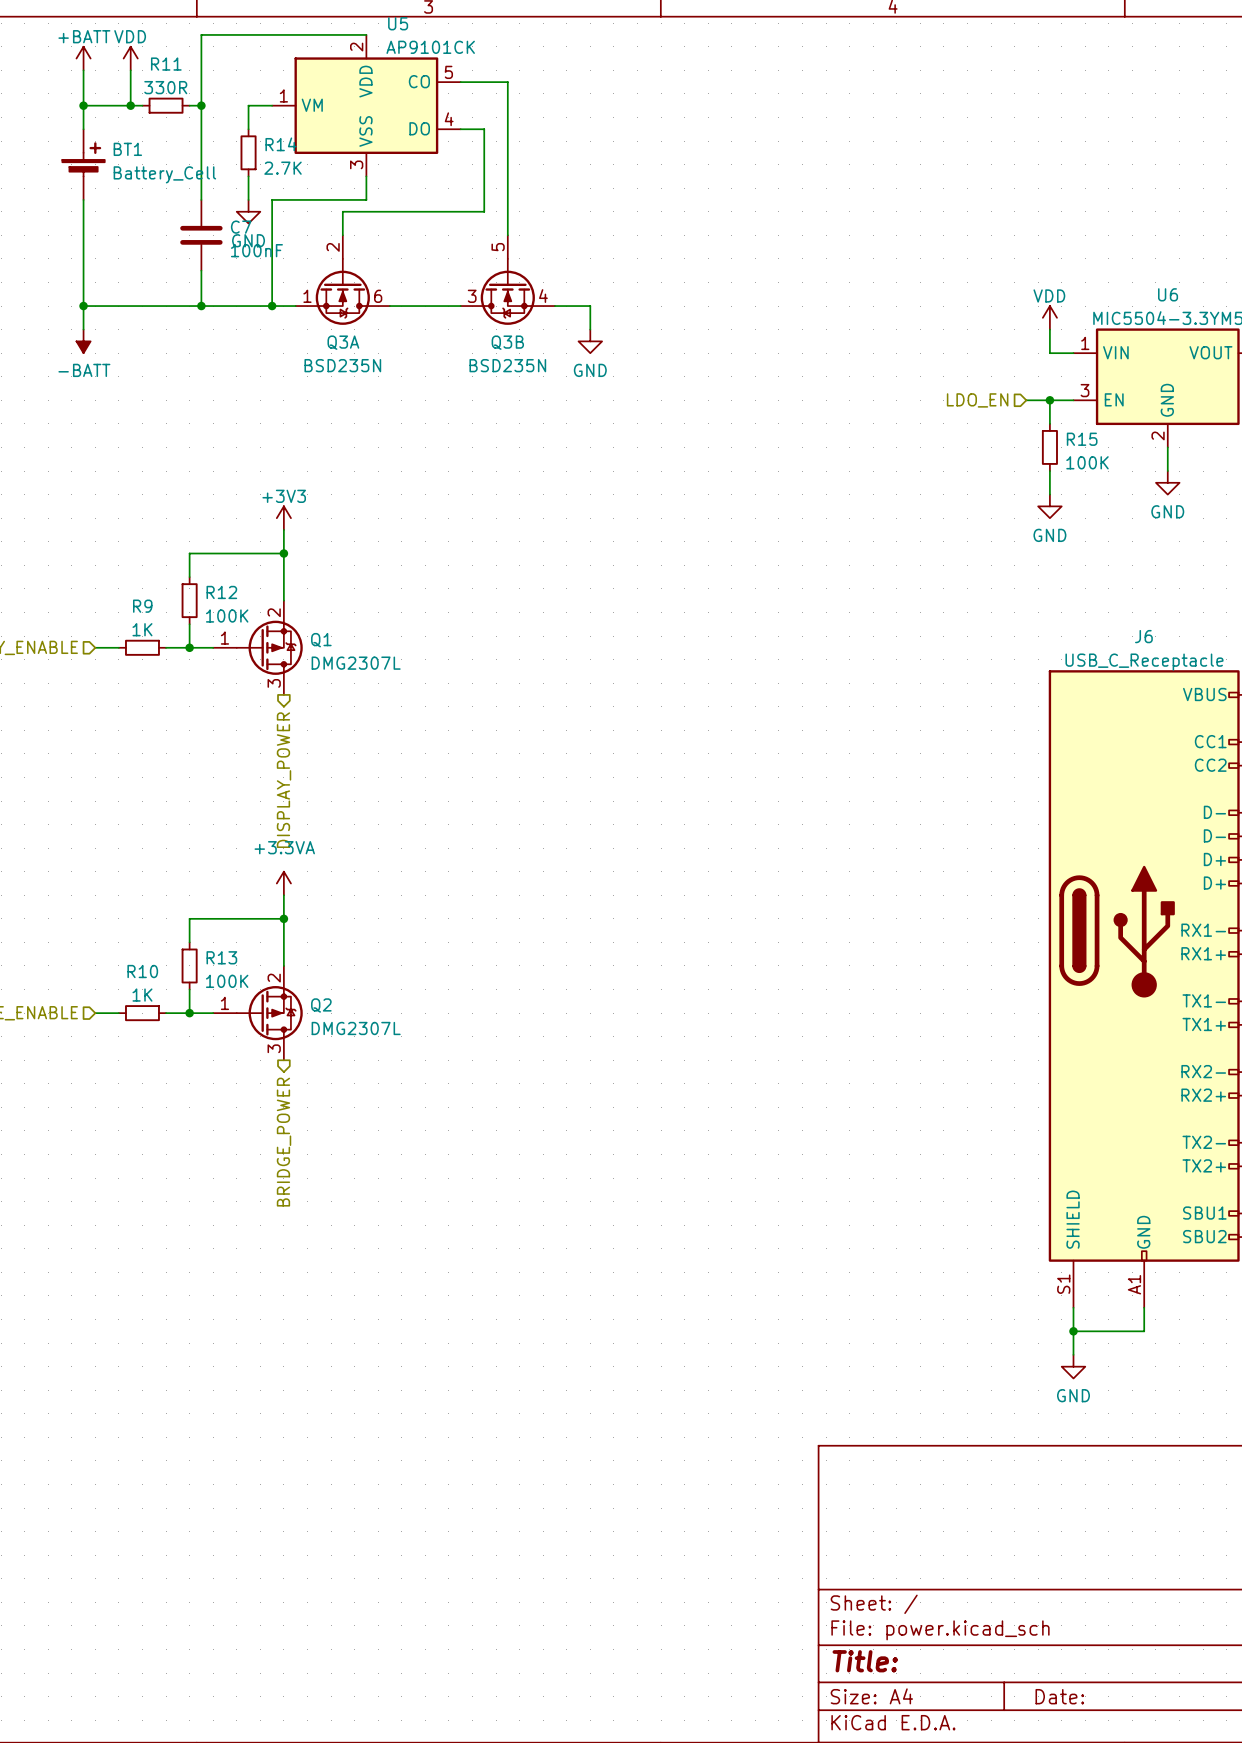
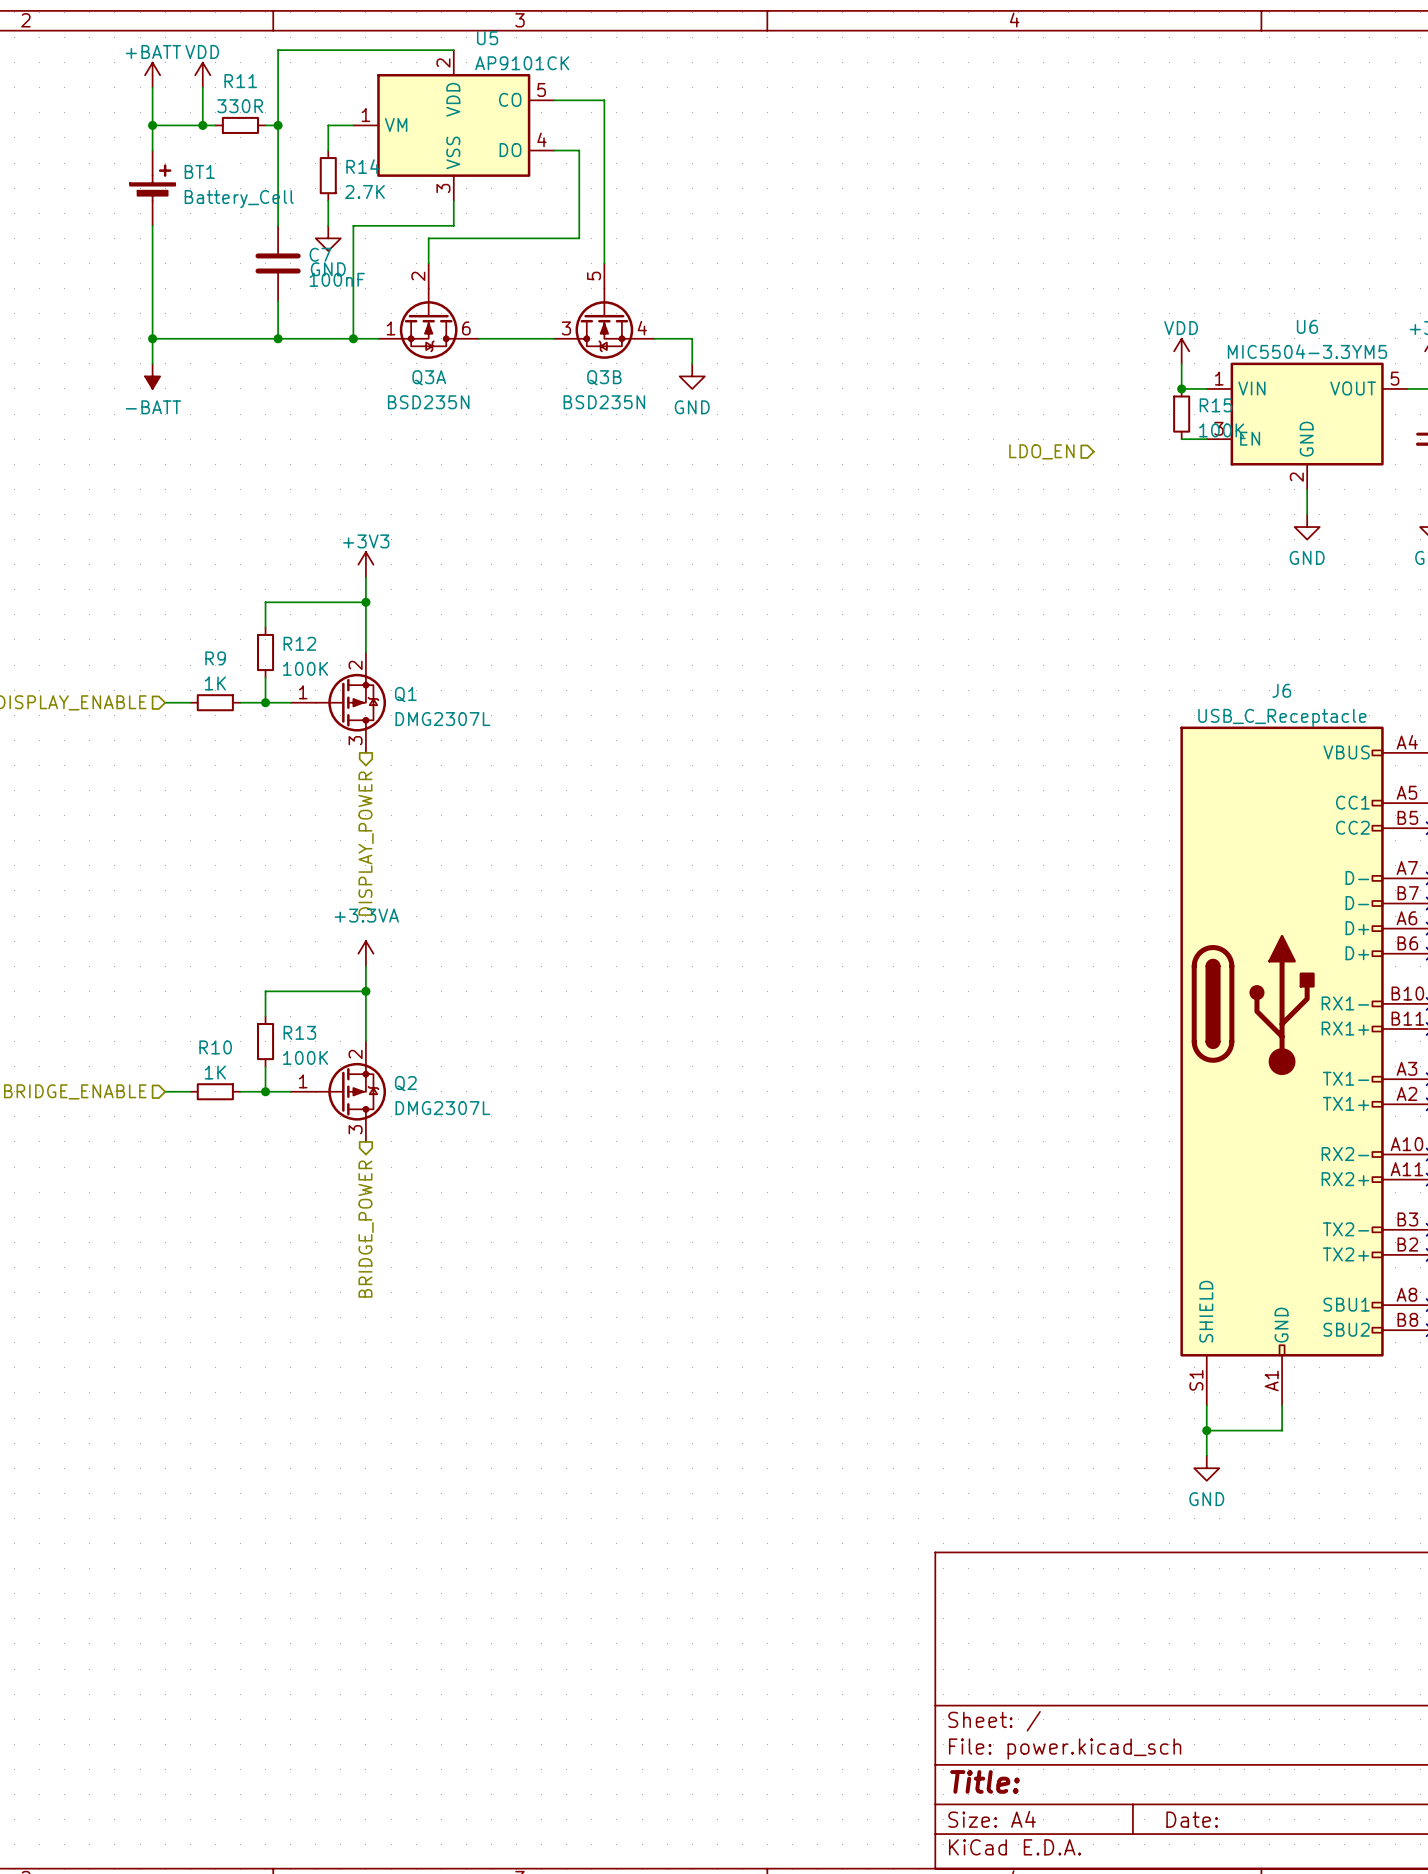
hierarchical label position: LDO_EN (977, 400) -> LDO_EN (1041, 451)
wire: (1026, 400) (1049, 400) (1049, 423) -> none
junction position: (1049, 400) -> (1181, 388)
R15 position: (1049, 447) -> (1181, 414)
wire: (1049, 471) (1049, 494) -> none
power symbol: GND (1049, 506) -> none

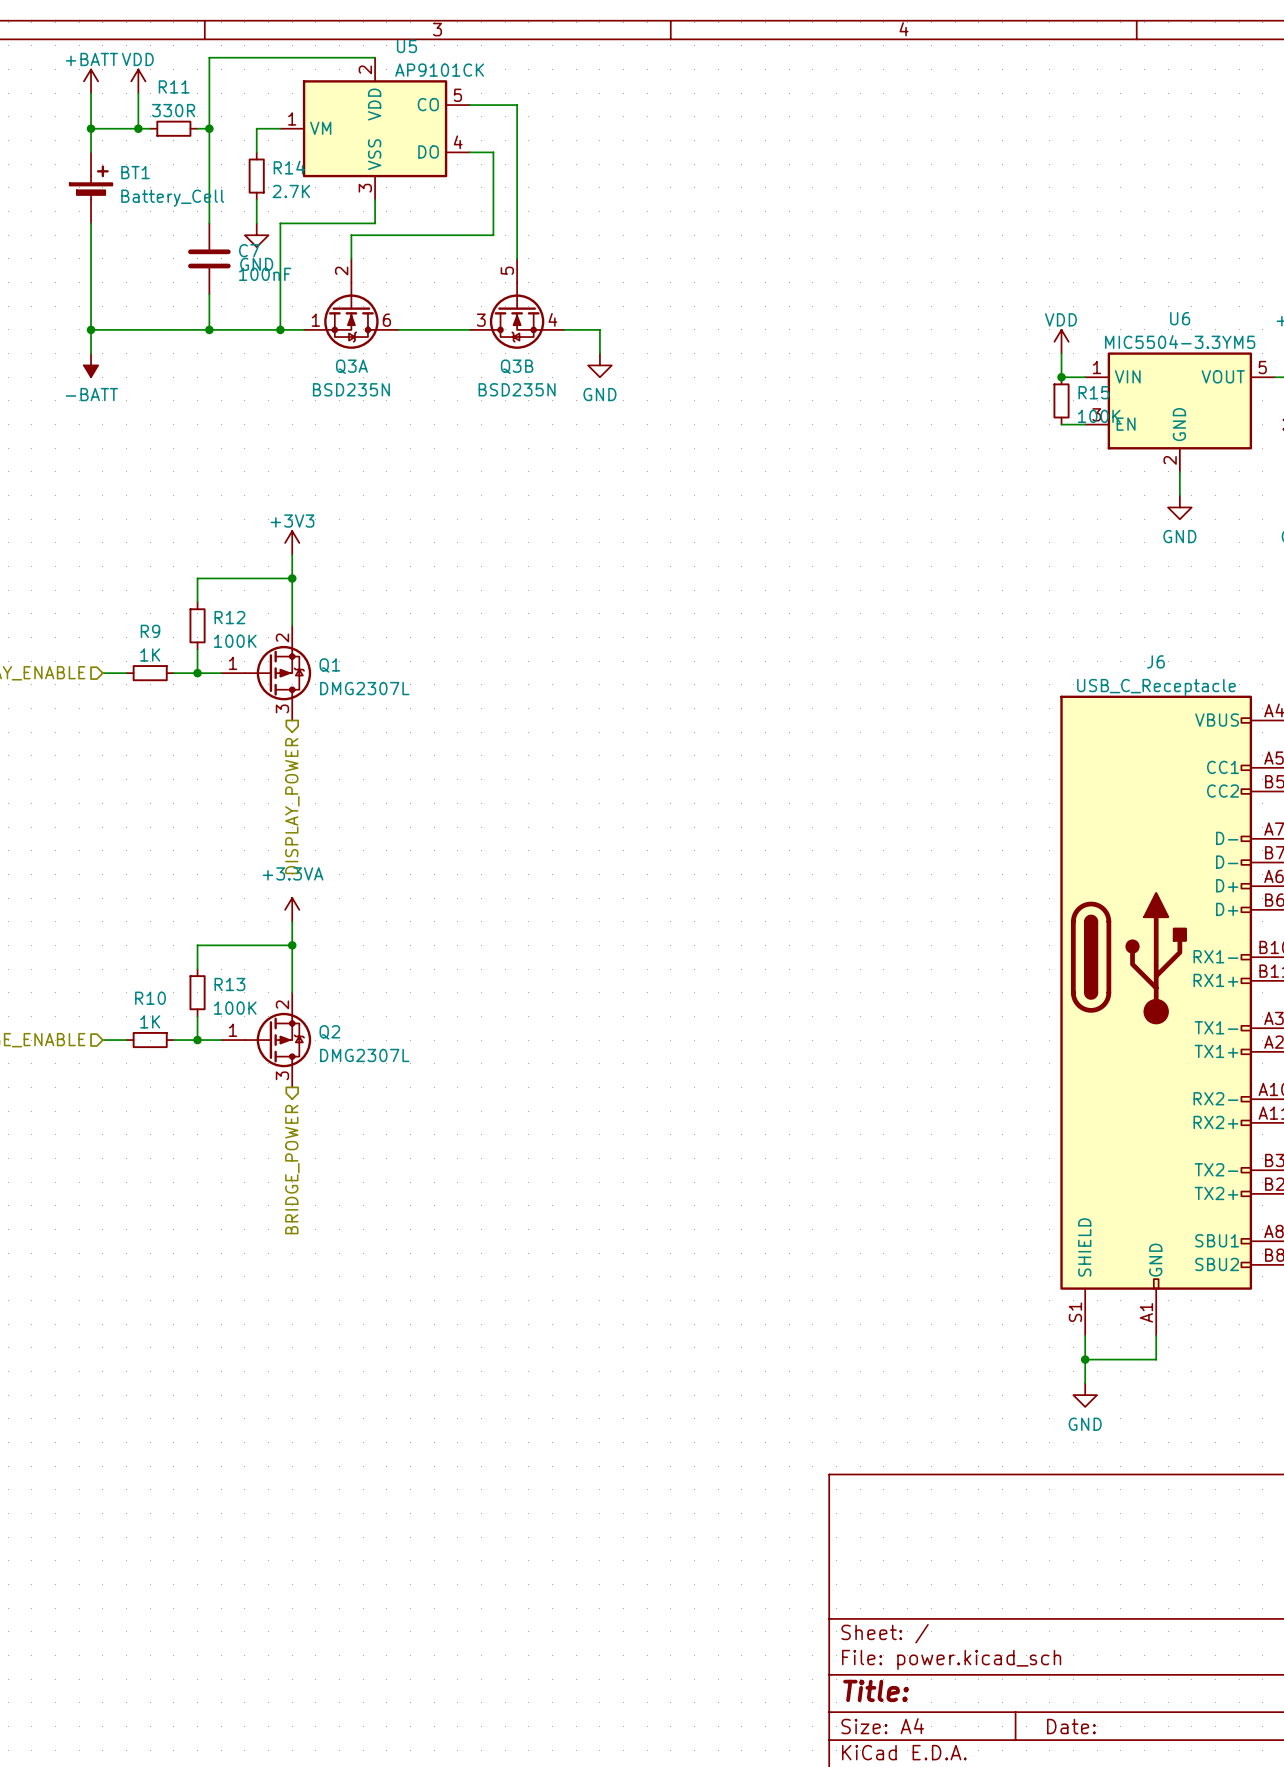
hierarchical label: LDO_EN (1041, 451) -> none

